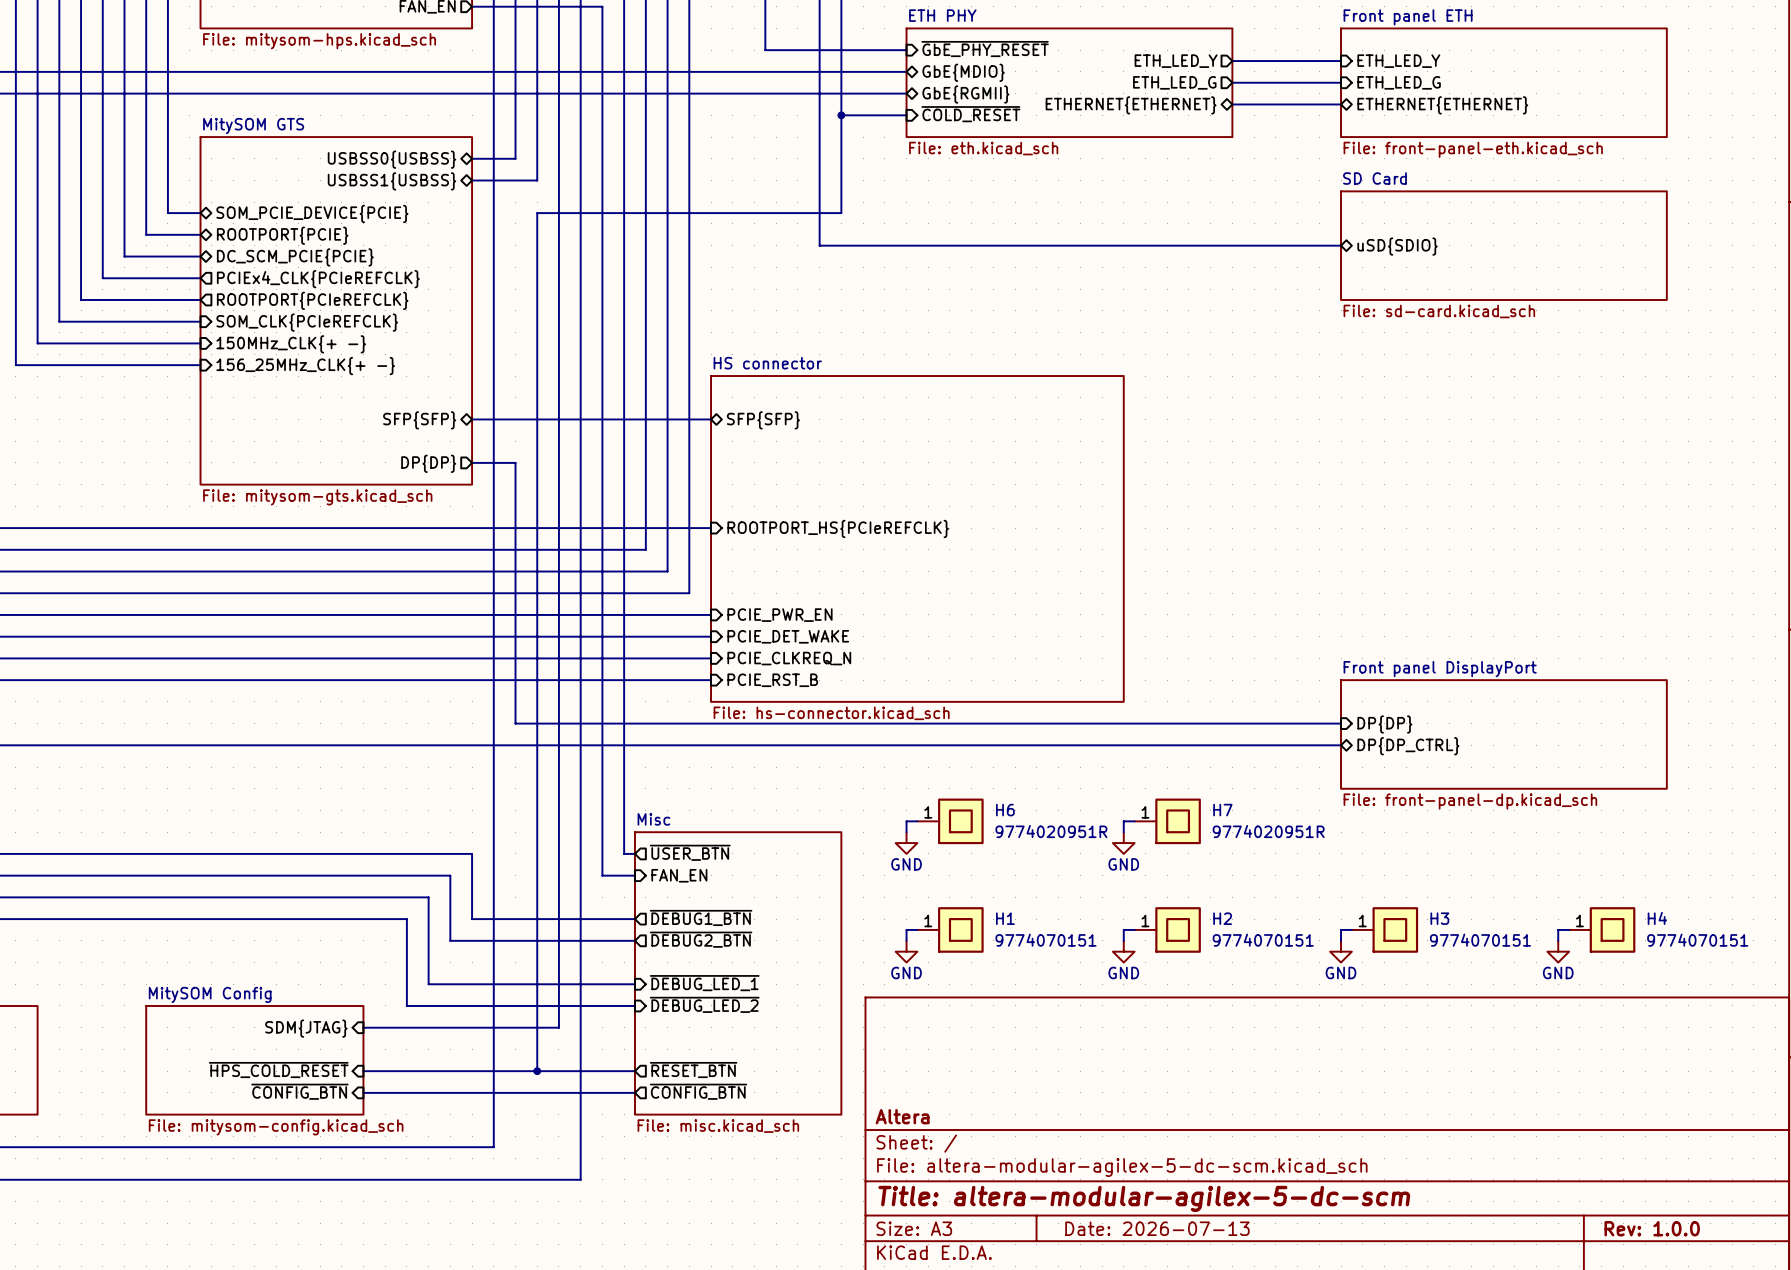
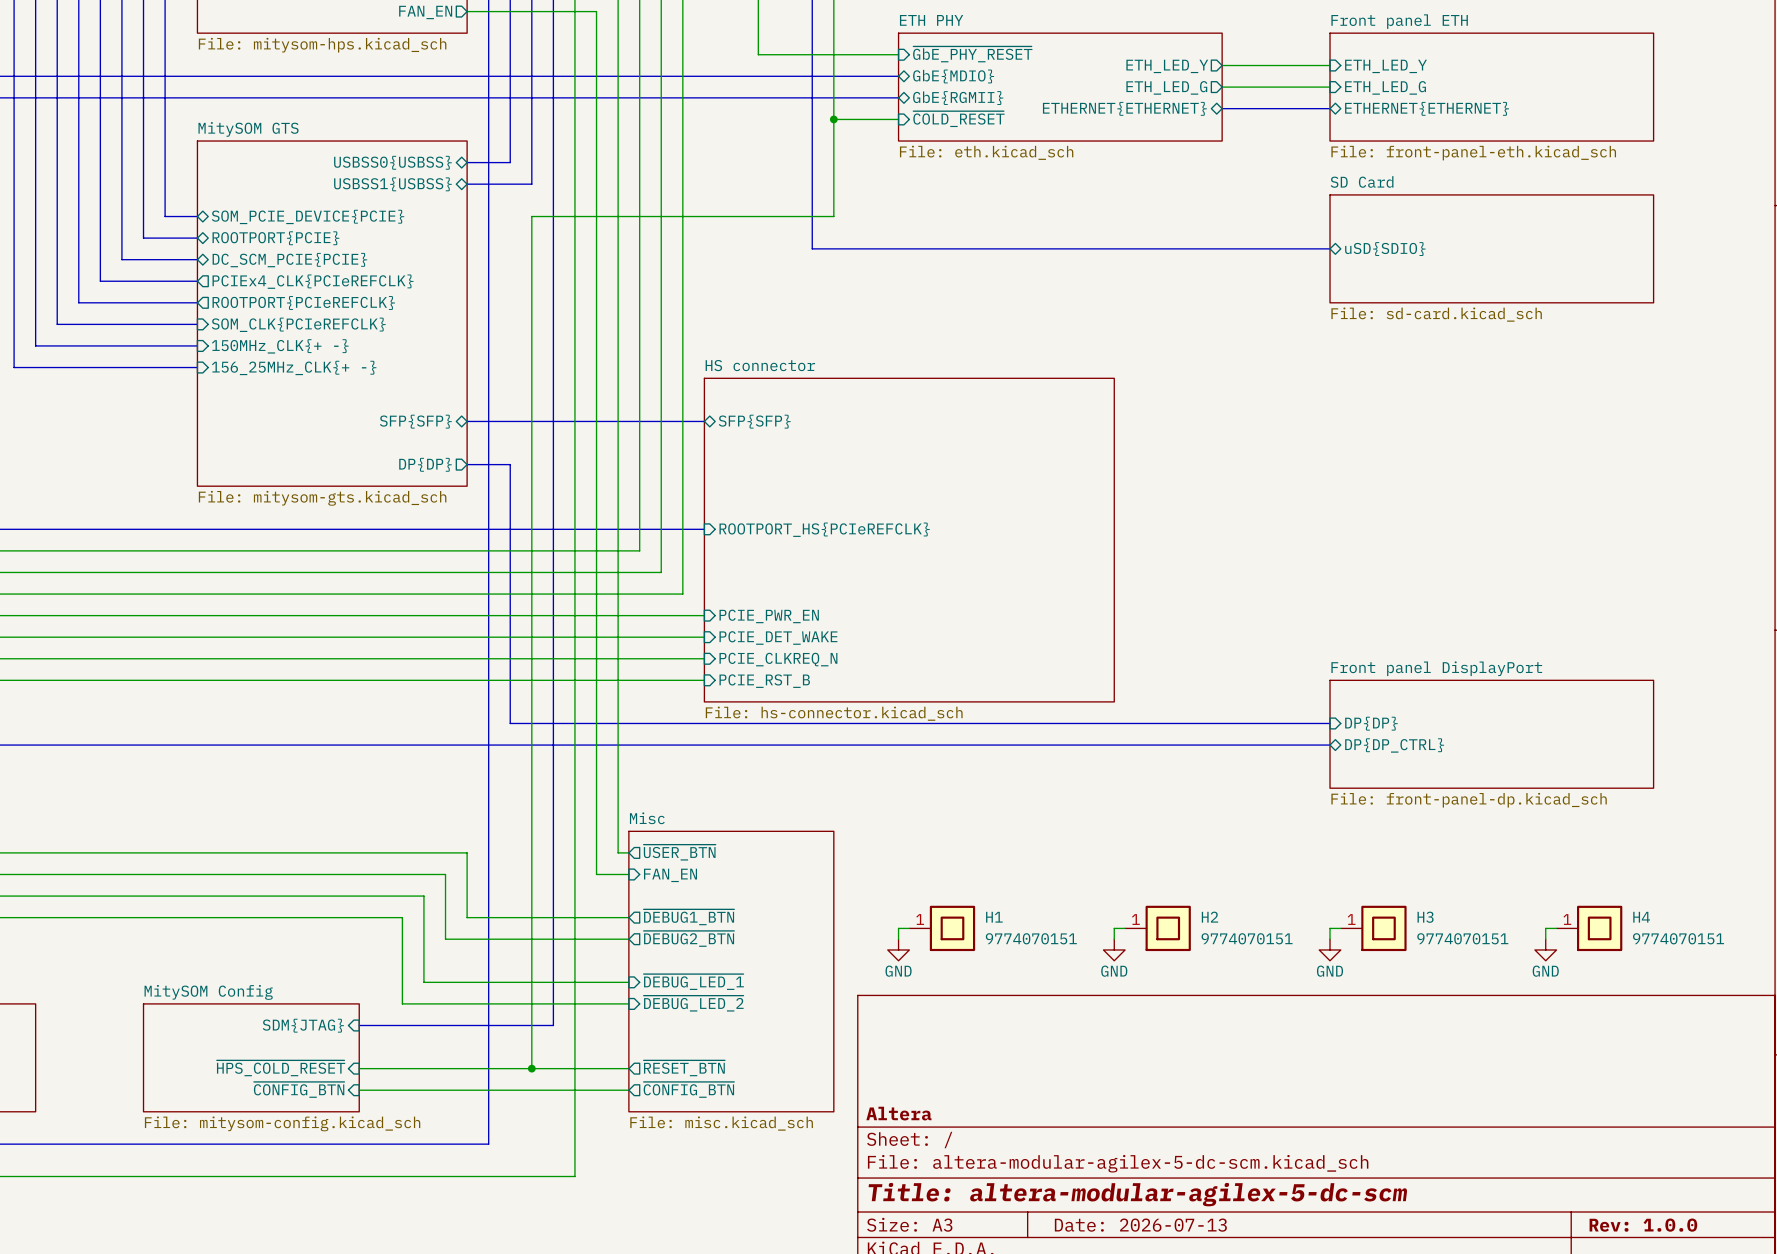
wire: (917, 821) (906, 821) (906, 832) -> none
H6: (950, 821) -> none
wire: (1134, 821) (1123, 821) (1123, 832) -> none
H7: (1167, 821) -> none
power symbol: GND (906, 843) -> none
power symbol: GND (1123, 843) -> none

